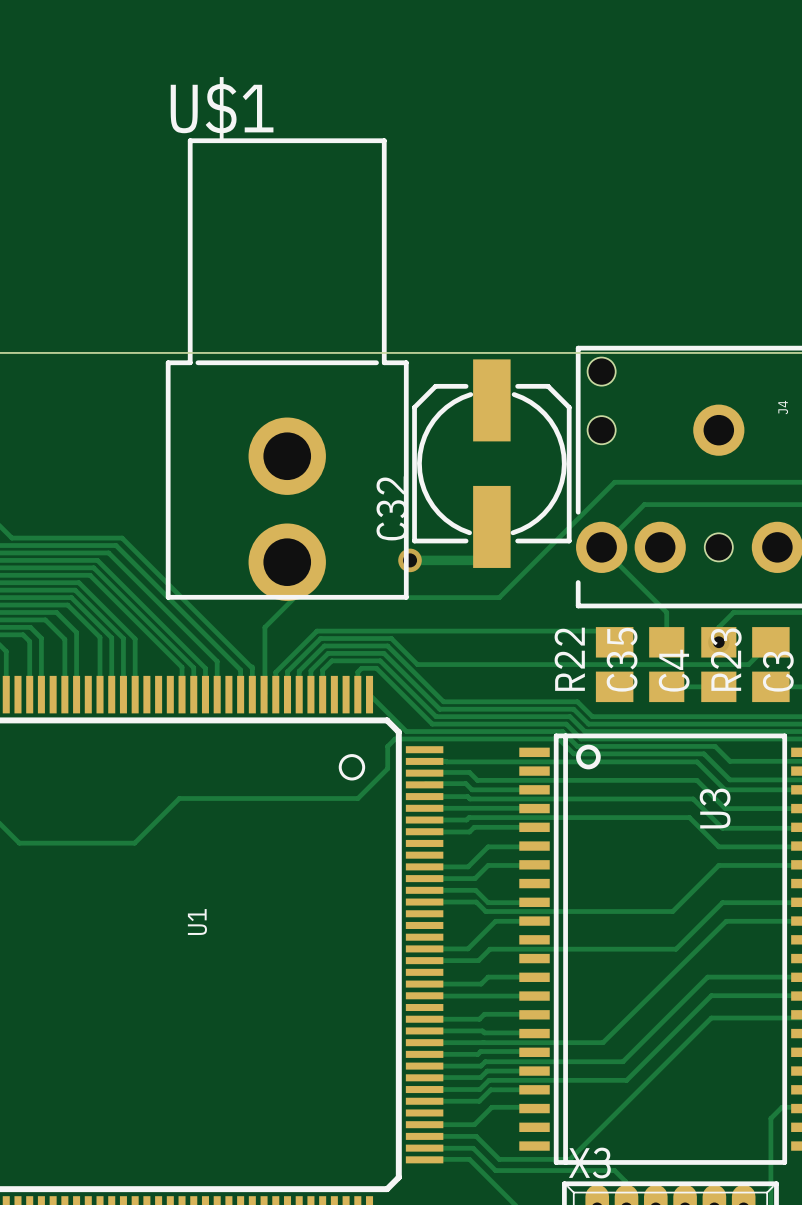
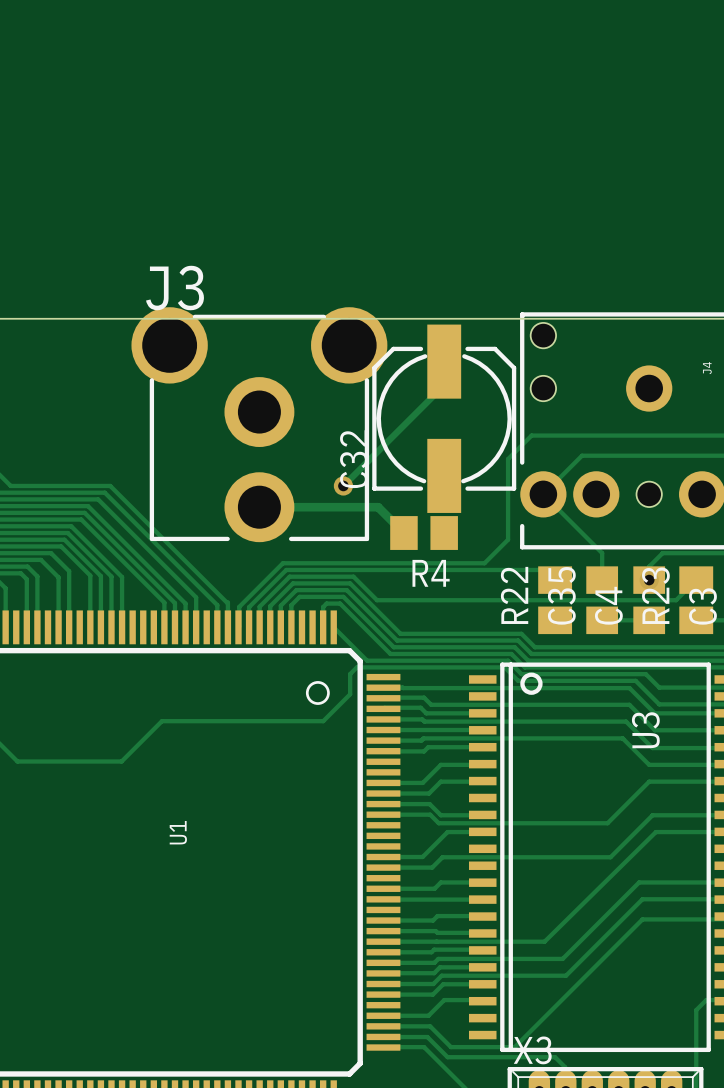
U$1: (287, 369) -> none
track: none -> (437, 361) (444, 361) (444, 385) (343, 485)
J3: none -> (259, 424)
track: (614, 482) (499, 597) (294, 597) (264, 627) (264, 672) -> (555, 435) (531, 435) (508, 459) (508, 539) (484, 563) (282, 563) (239, 606)
via: none -> (343, 485)
track: (491, 549) (484, 549) (473, 560) (410, 560) -> none
via: (410, 560) -> none
track: none -> (259, 507) (378, 507) (403, 533)
R4: none -> (424, 533)

